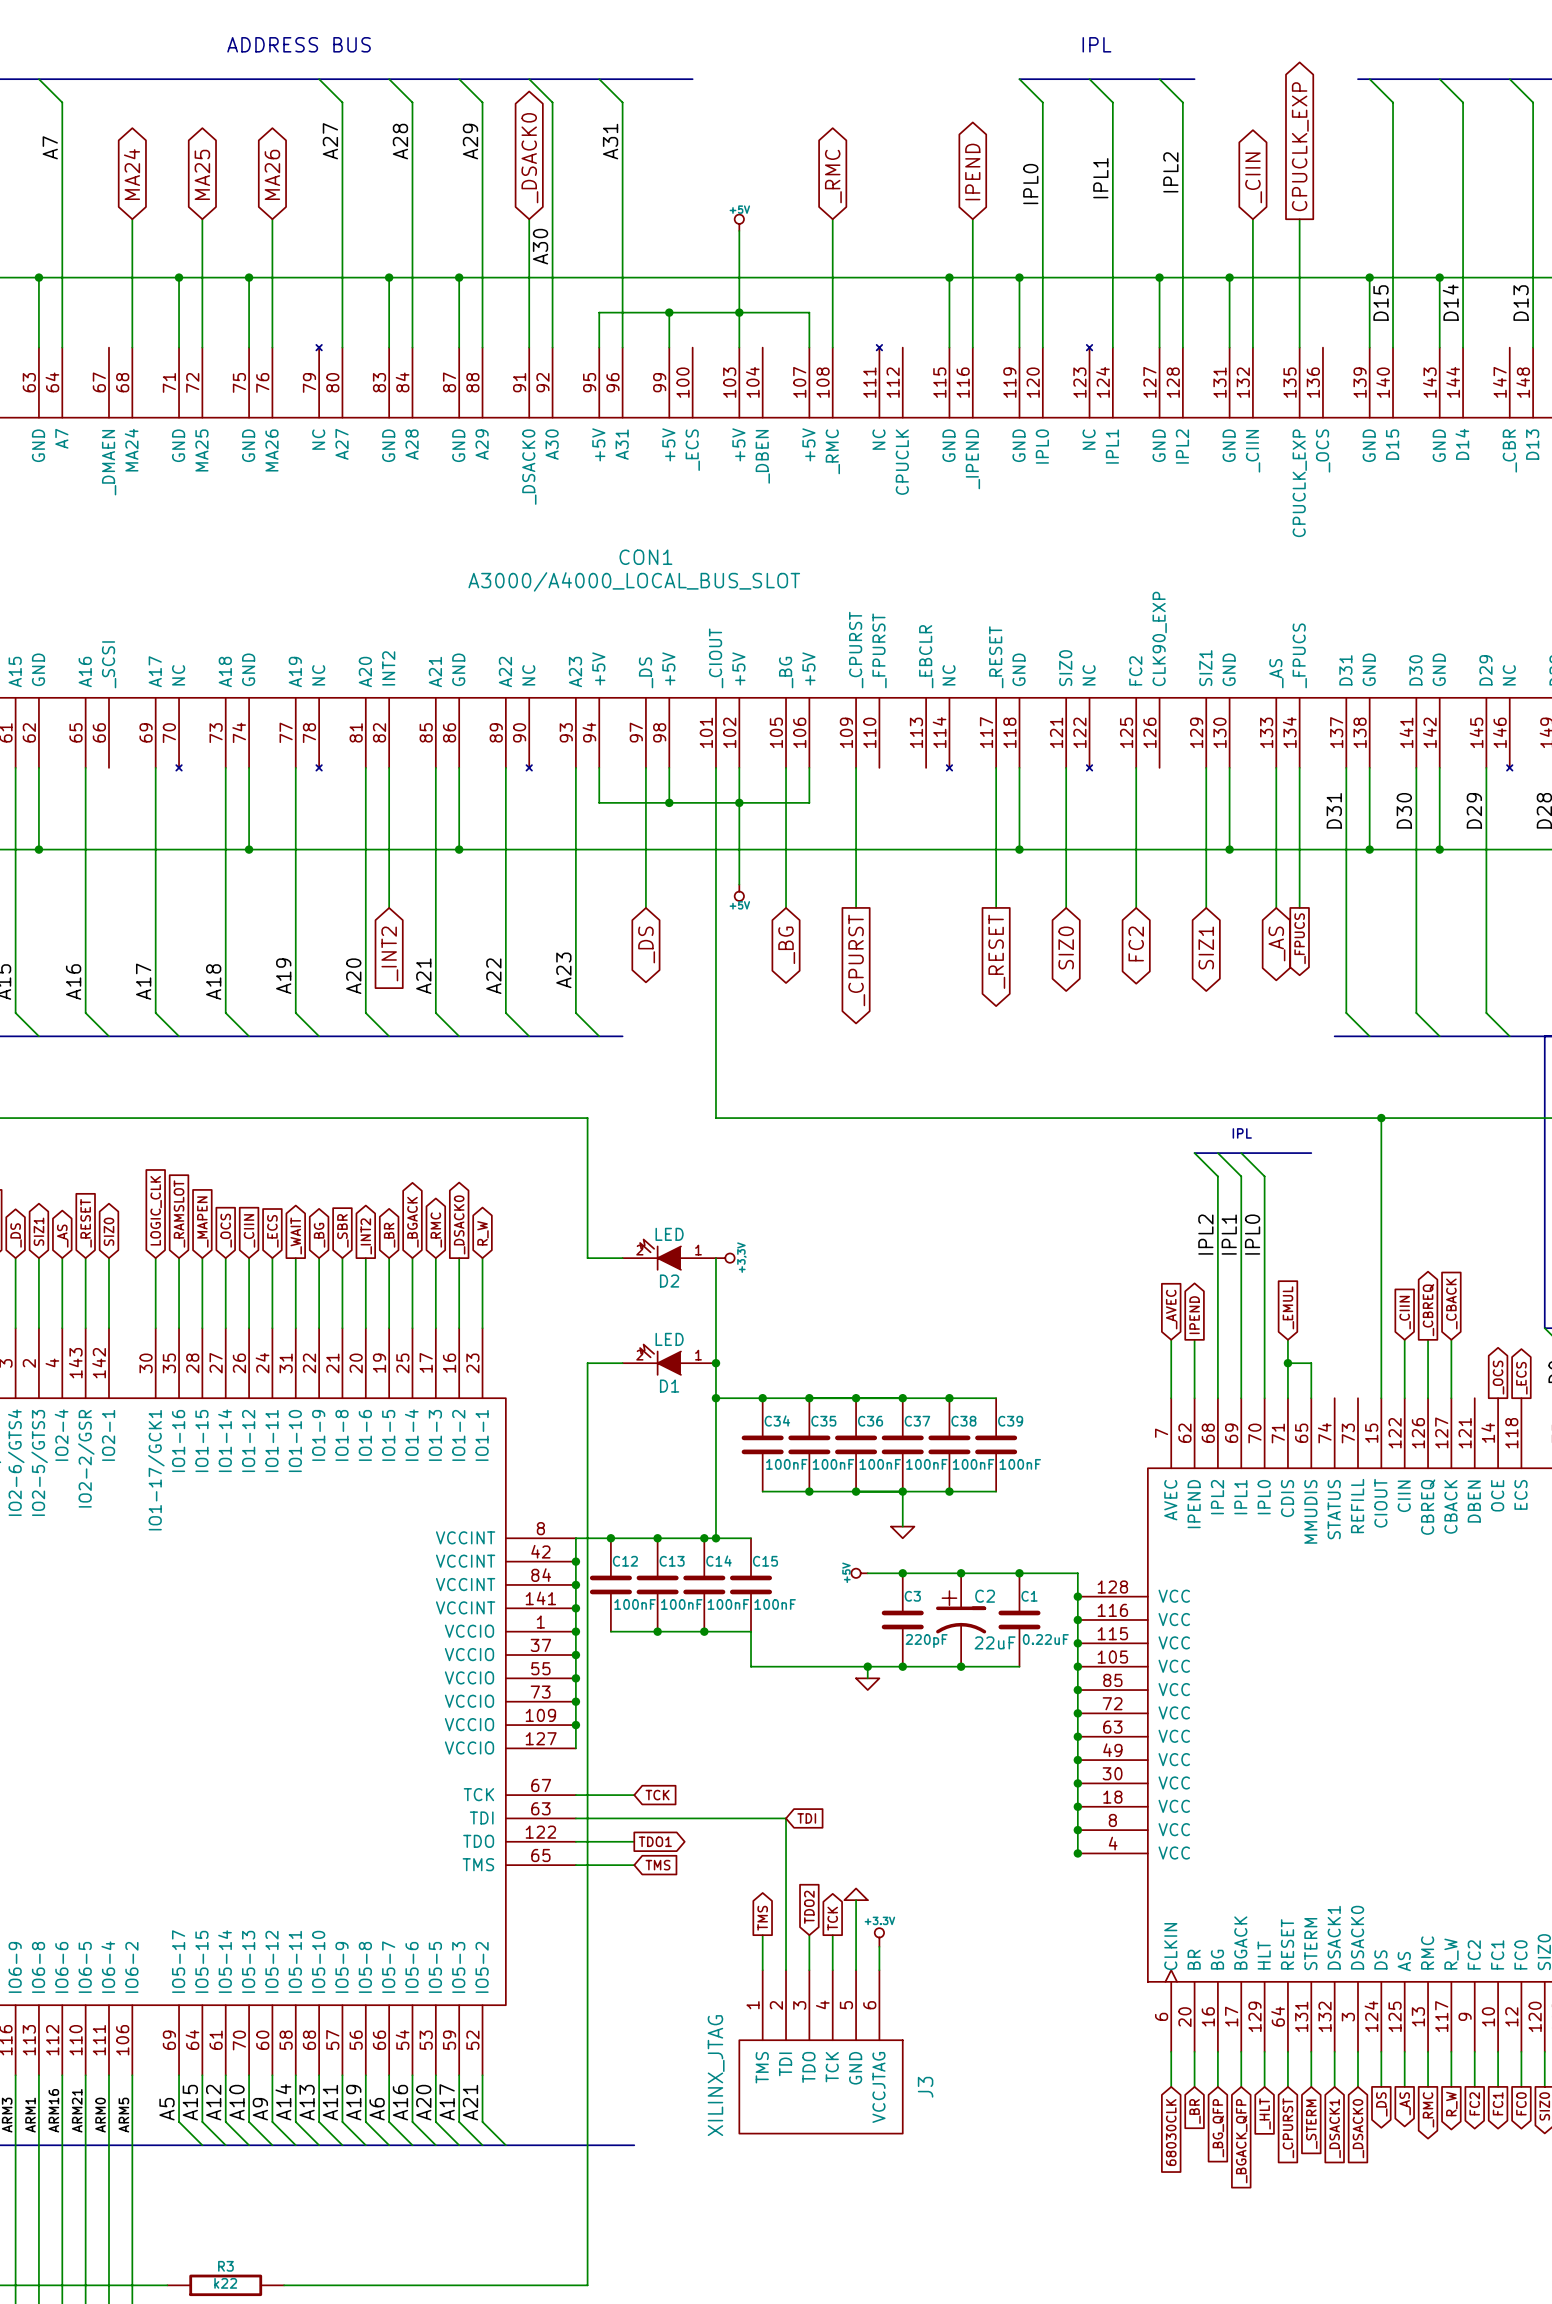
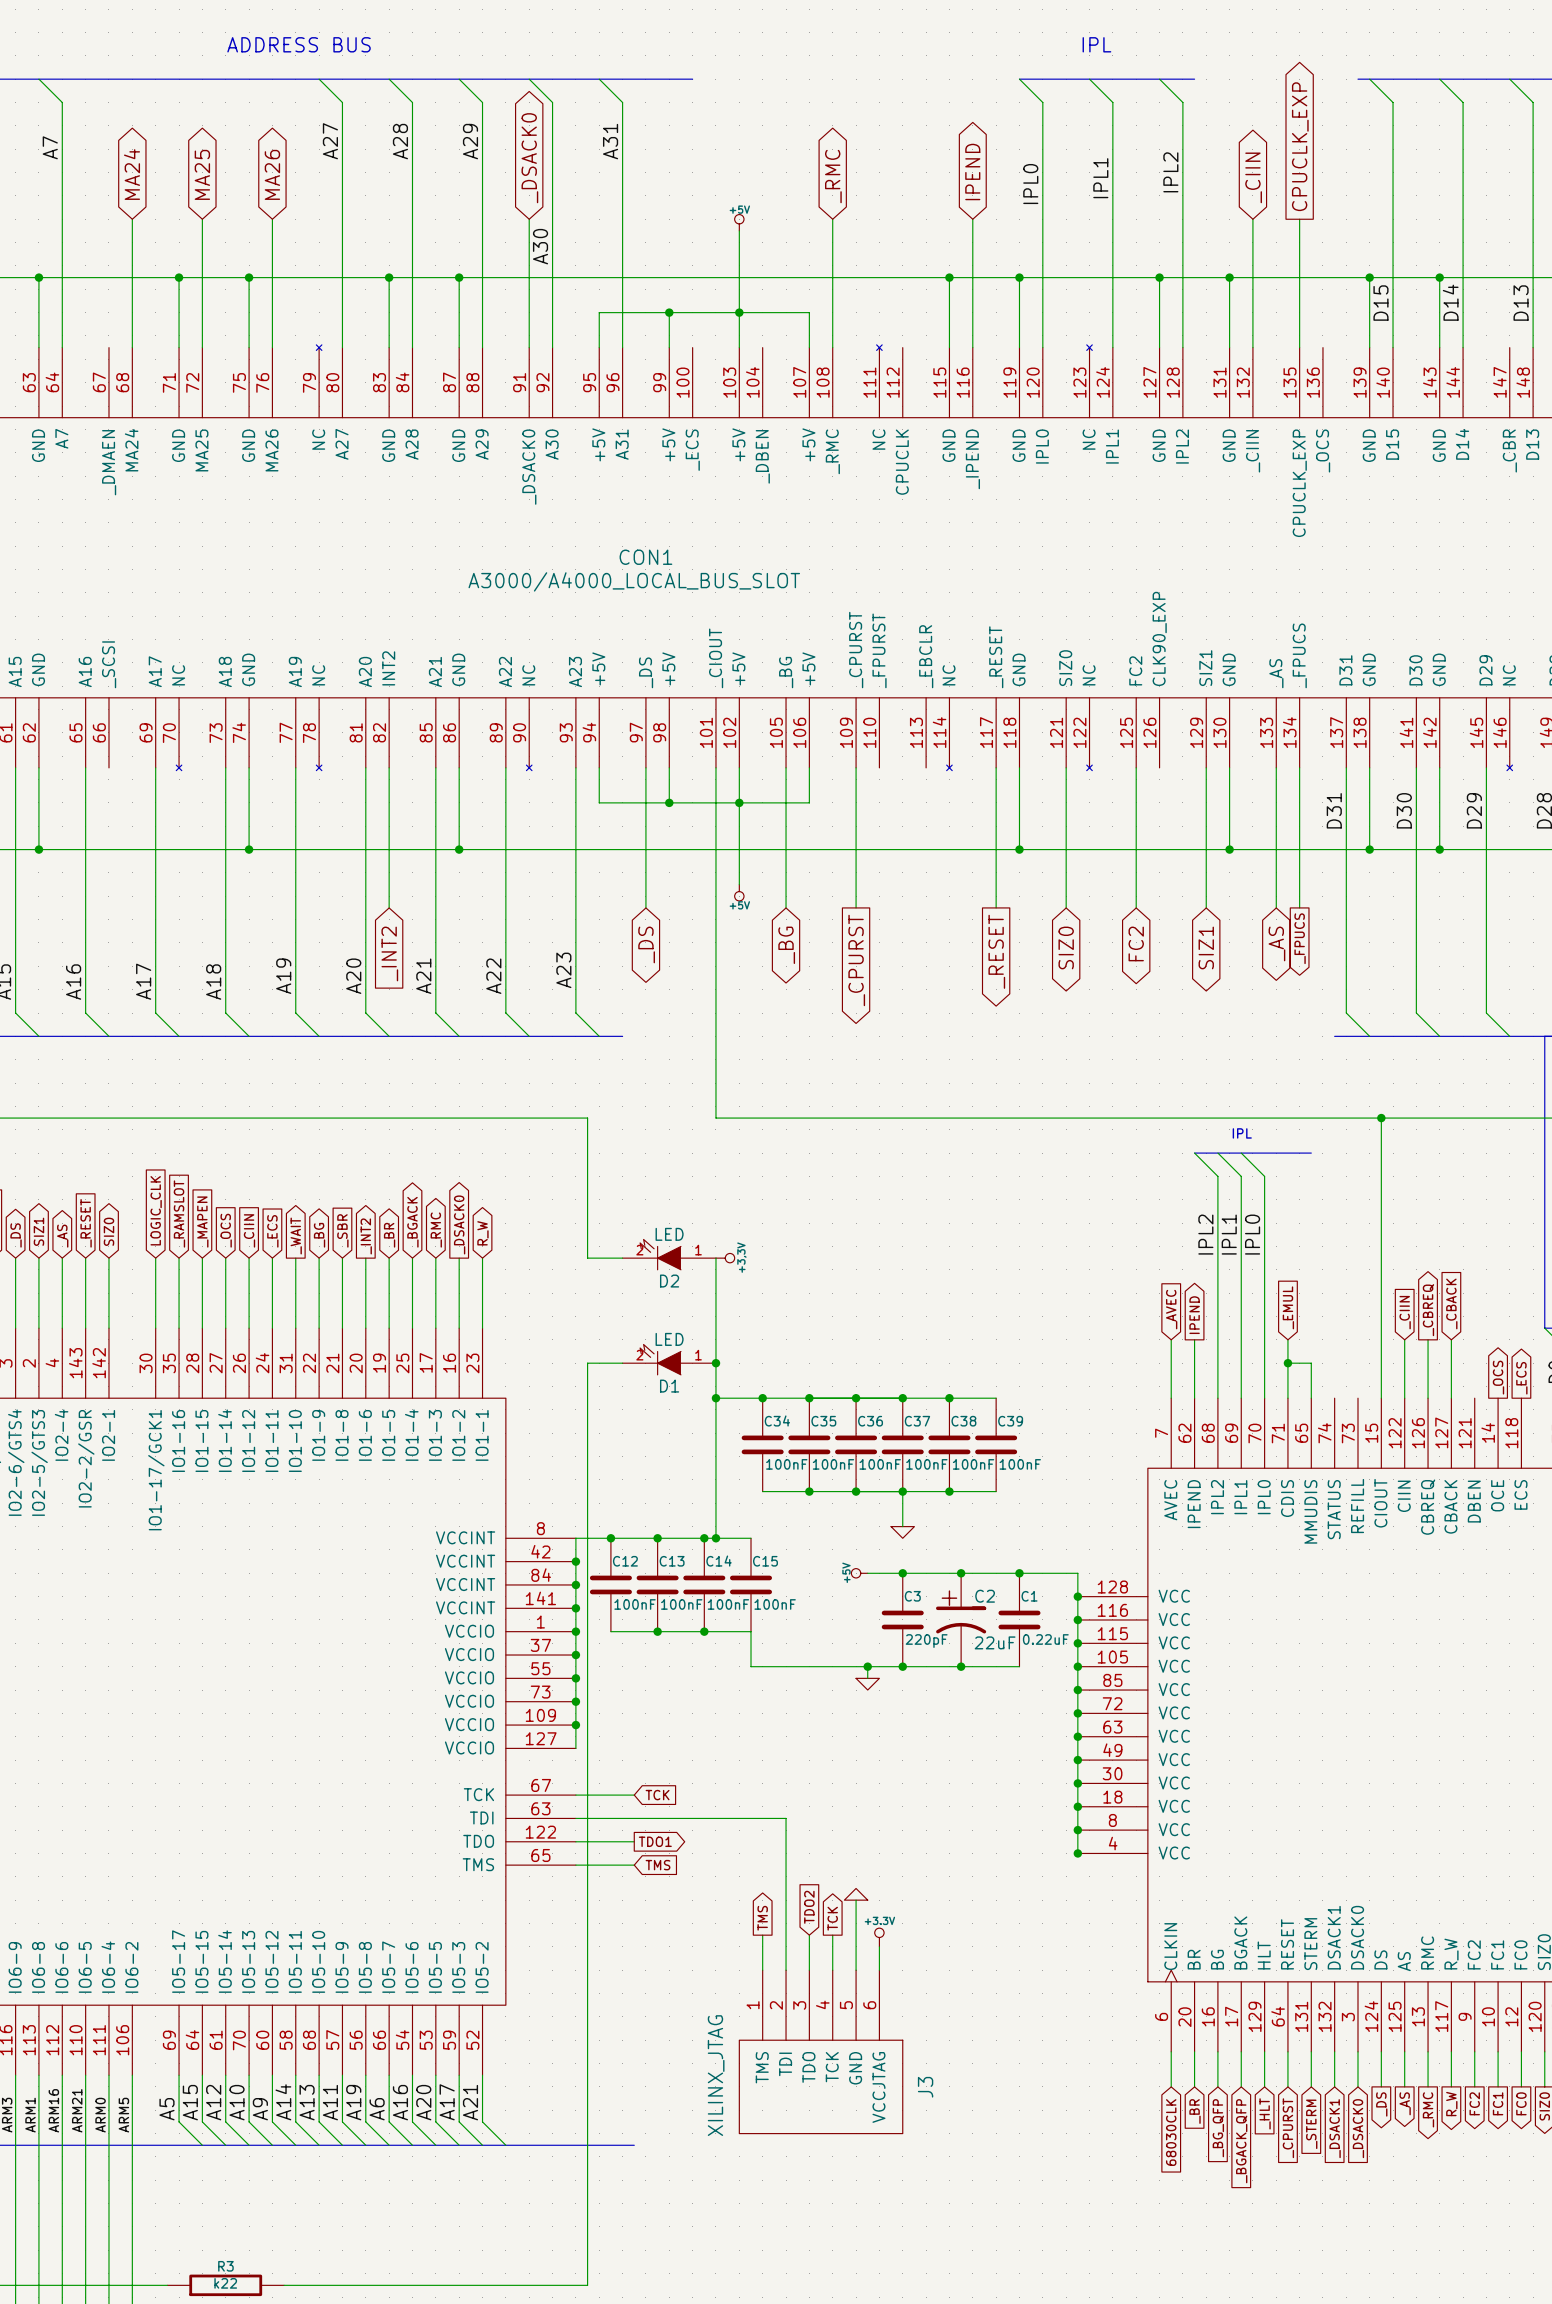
global label: TDI (806, 1818) -> none

